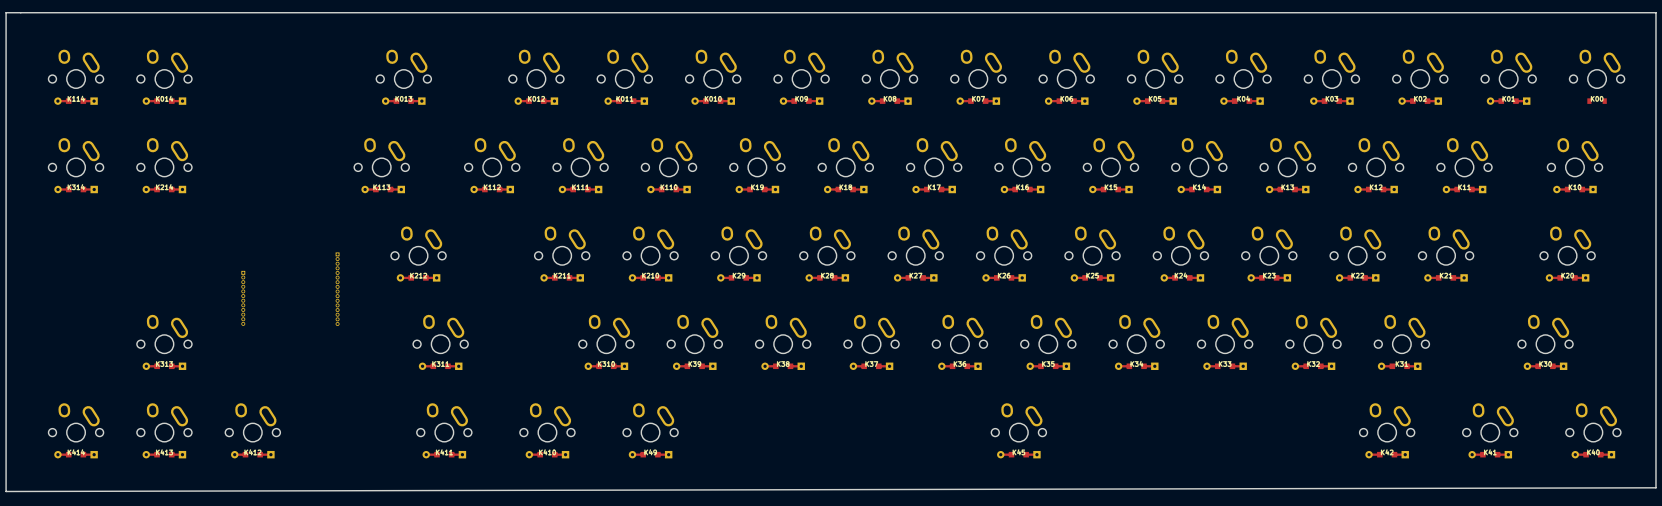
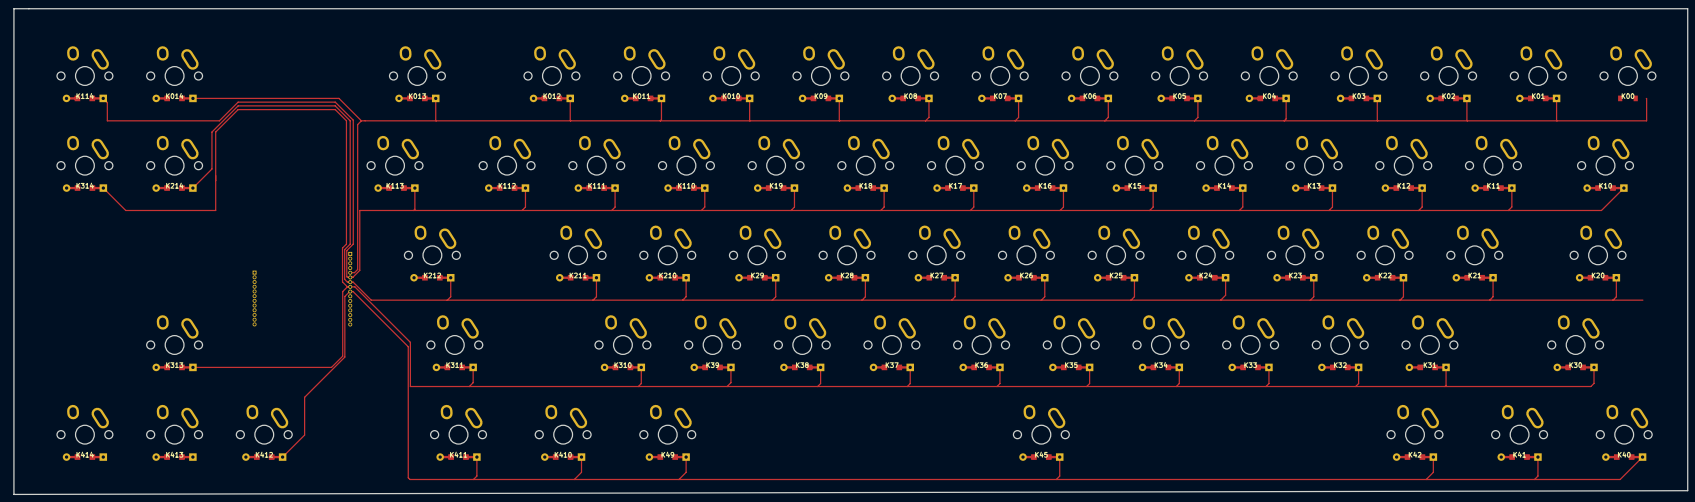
top track: none -> (103, 98) (107, 102) (107, 120) (219, 120) (238, 102) (335, 102) (353, 120) (353, 244) (346, 250) (346, 276) (350, 277)
top track: none -> (192, 98) (338, 98) (361, 120)
top track: none -> (435, 98) (436, 120)
top track: none -> (570, 98) (570, 120)
top track: none -> (661, 98) (660, 120)
top track: none -> (749, 98) (749, 120)
top track: none -> (839, 98) (839, 120)
top track: none -> (928, 98) (928, 117) (925, 120)
top track: none -> (1018, 98) (1018, 117) (1015, 120)
top track: none -> (1108, 98) (1108, 117) (1104, 120)
top track: none -> (1197, 98) (1197, 117) (1194, 120)
top track: none -> (1286, 98) (1286, 118) (1284, 120)
top track: none -> (1377, 98) (1377, 120)
top track: none -> (1466, 98) (1467, 120)
top track: none -> (1556, 98) (1556, 120)
top track: none -> (1646, 98) (1646, 120) (361, 120)
top track: none -> (361, 120) (357, 124) (357, 269) (354, 272) (350, 272)
top track: none -> (103, 188) (125, 210) (215, 210) (215, 132) (238, 109) (335, 109) (346, 120) (346, 244) (342, 248) (342, 281) (347, 286)
top track: none -> (192, 188) (211, 169) (211, 132) (238, 105) (335, 105) (350, 120) (350, 244) (344, 249) (344, 279) (350, 282)
top track: none -> (414, 188) (413, 210)
top track: none -> (525, 188) (525, 207) (522, 210)
top track: none -> (615, 188) (615, 207) (611, 210)
top track: none -> (704, 188) (704, 207) (701, 210)
top track: none -> (794, 188) (794, 207) (791, 210)
top track: none -> (884, 188) (884, 207) (880, 210)
top track: none -> (973, 188) (973, 207) (970, 210)
top track: none -> (1063, 188) (1063, 207) (1060, 210)
top track: none -> (1153, 188) (1153, 207) (1149, 210)
top track: none -> (1242, 188) (1242, 207) (1239, 210)
top track: none -> (1332, 188) (1332, 207) (1329, 210)
top track: none -> (1422, 188) (1422, 207) (1418, 210)
top track: none -> (1511, 188) (1511, 207) (1508, 210)
top track: none -> (1623, 188) (1601, 210) (359, 210) (359, 270) (350, 277)
top track: none -> (450, 277) (450, 296) (447, 300)
top track: none -> (596, 277) (596, 296) (593, 300)
top track: none -> (686, 277) (686, 296) (682, 300)
top track: none -> (775, 277) (775, 296) (772, 300)
top track: none -> (865, 277) (865, 296) (862, 300)
top track: none -> (955, 277) (955, 296) (951, 300)
top track: none -> (1044, 277) (1044, 296) (1041, 300)
top track: none -> (1134, 277) (1134, 296) (1131, 300)
top track: none -> (1225, 277) (1225, 295) (1220, 300)
top track: none -> (1313, 277) (1313, 296) (1310, 300)
top track: none -> (1403, 277) (1403, 296) (1400, 300)
top track: none -> (1493, 277) (1493, 296) (1489, 300)
top track: none -> (1616, 277) (1616, 296) (1613, 300)
top track: none -> (350, 282) (353, 282) (371, 300) (1642, 300)
top track: none -> (347, 286) (354, 286) (410, 342) (410, 386) (1590, 386) (1593, 383) (1593, 367)
top track: none -> (347, 286) (342, 291) (342, 356) (331, 367) (192, 367)
top track: none -> (473, 367) (473, 382) (469, 386)
top track: none -> (641, 367) (641, 383) (638, 386)
top track: none -> (730, 367) (730, 382) (727, 386)
top track: none -> (820, 367) (820, 383) (817, 386)
top track: none -> (910, 367) (910, 383) (907, 386)
top track: none -> (999, 367) (999, 383) (996, 386)
top track: none -> (1089, 367) (1089, 383) (1086, 386)
top track: none -> (1179, 367) (1179, 383) (1176, 386)
top track: none -> (1268, 367) (1268, 383) (1265, 386)
top track: none -> (1358, 367) (1358, 383) (1355, 386)
top track: none -> (1446, 367) (1444, 386)
top track: none -> (476, 457) (476, 476) (473, 479)
top track: none -> (581, 457) (581, 472) (574, 479)
top track: none -> (686, 457) (686, 472) (678, 479)
top track: none -> (1059, 457) (1059, 476) (1056, 479)
top track: none -> (1433, 457) (1433, 472) (1426, 479)
top track: none -> (1537, 457) (1537, 476) (1534, 479)
top track: none -> (1642, 457) (1620, 479) (409, 479) (408, 477) (408, 346) (353, 291) (349, 291) (344, 296) (344, 357) (304, 397) (304, 435) (282, 457)

